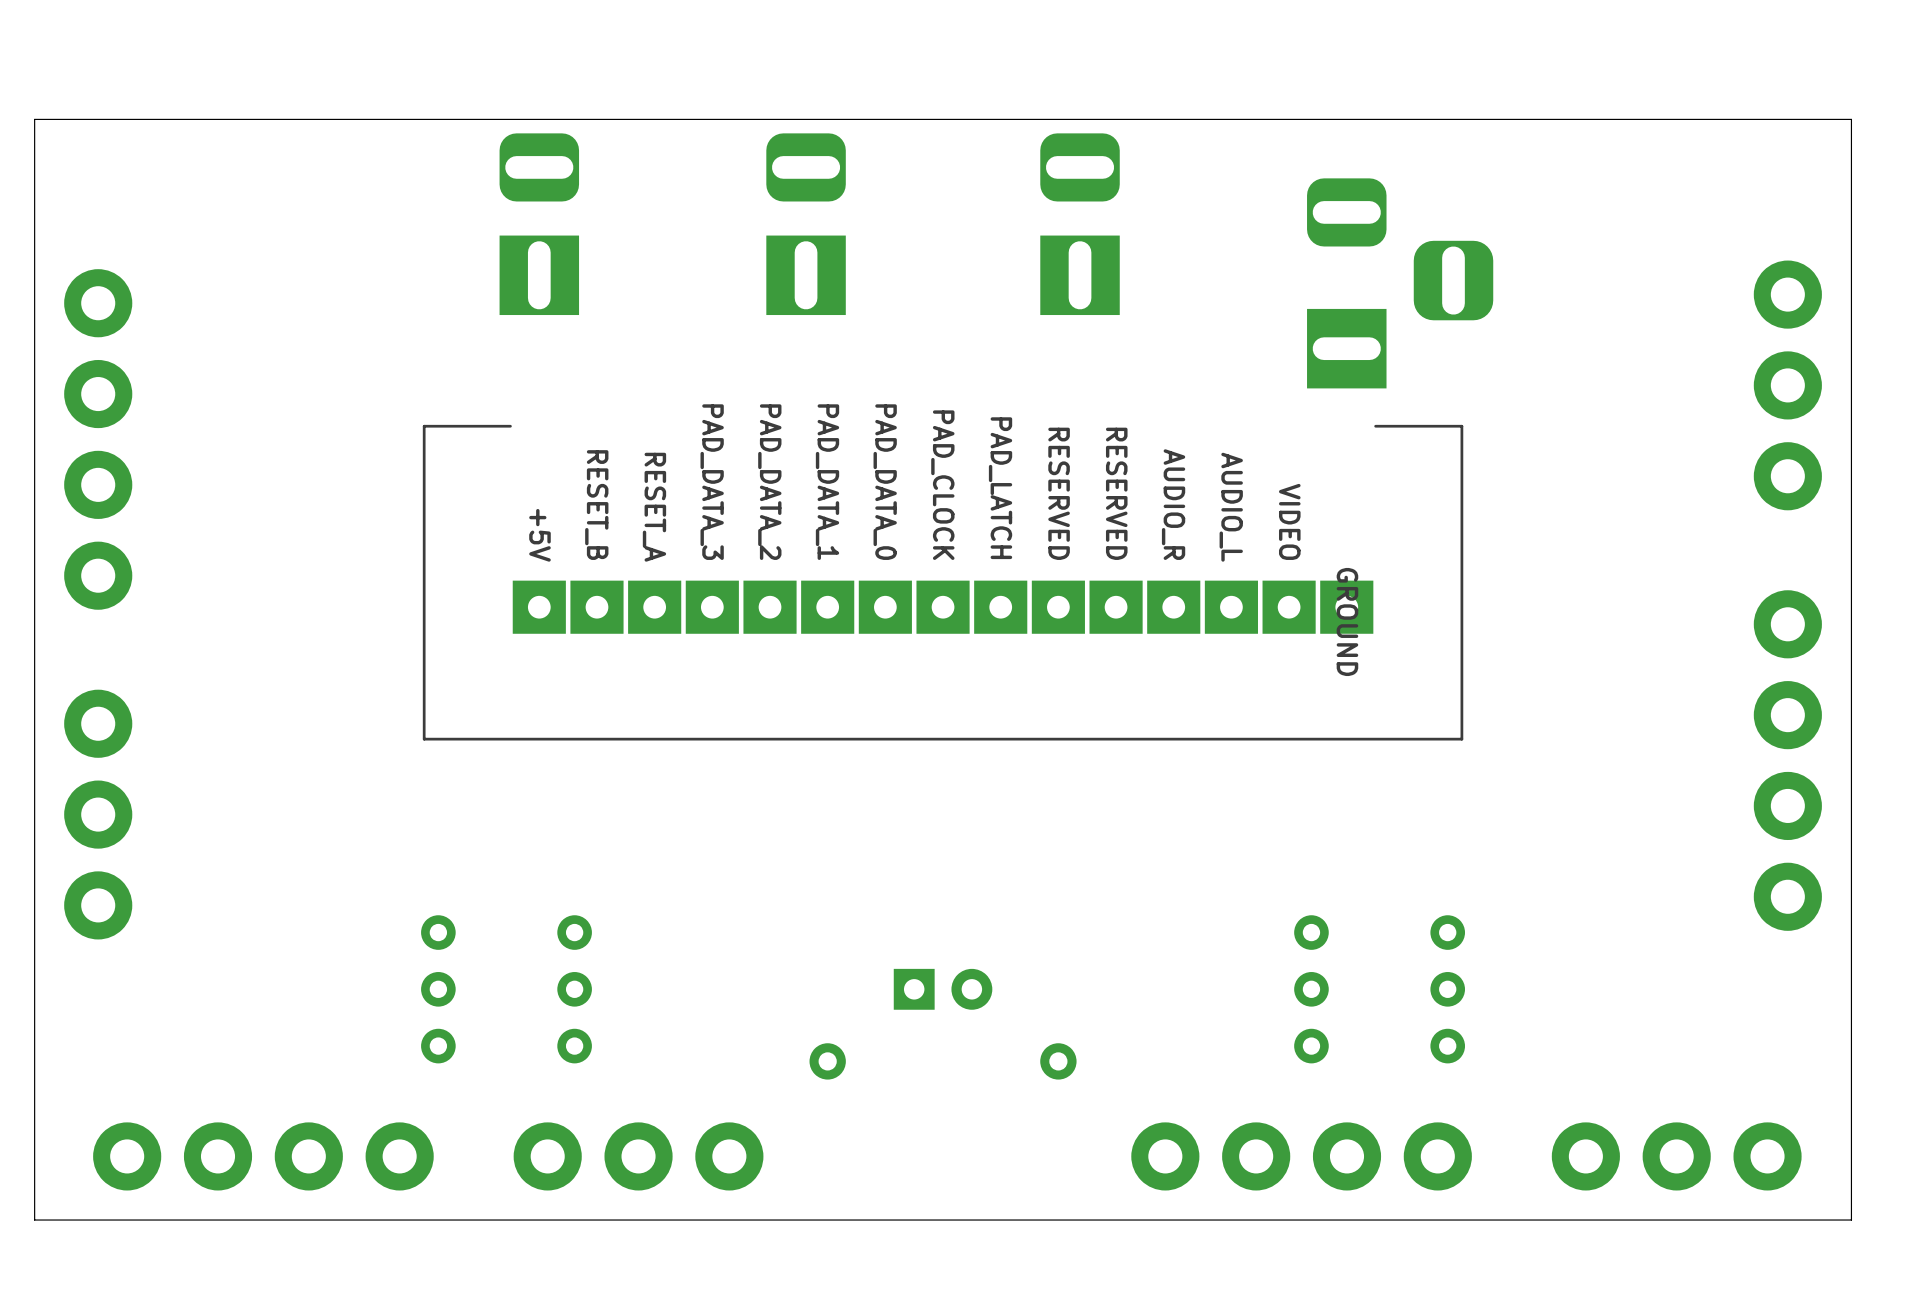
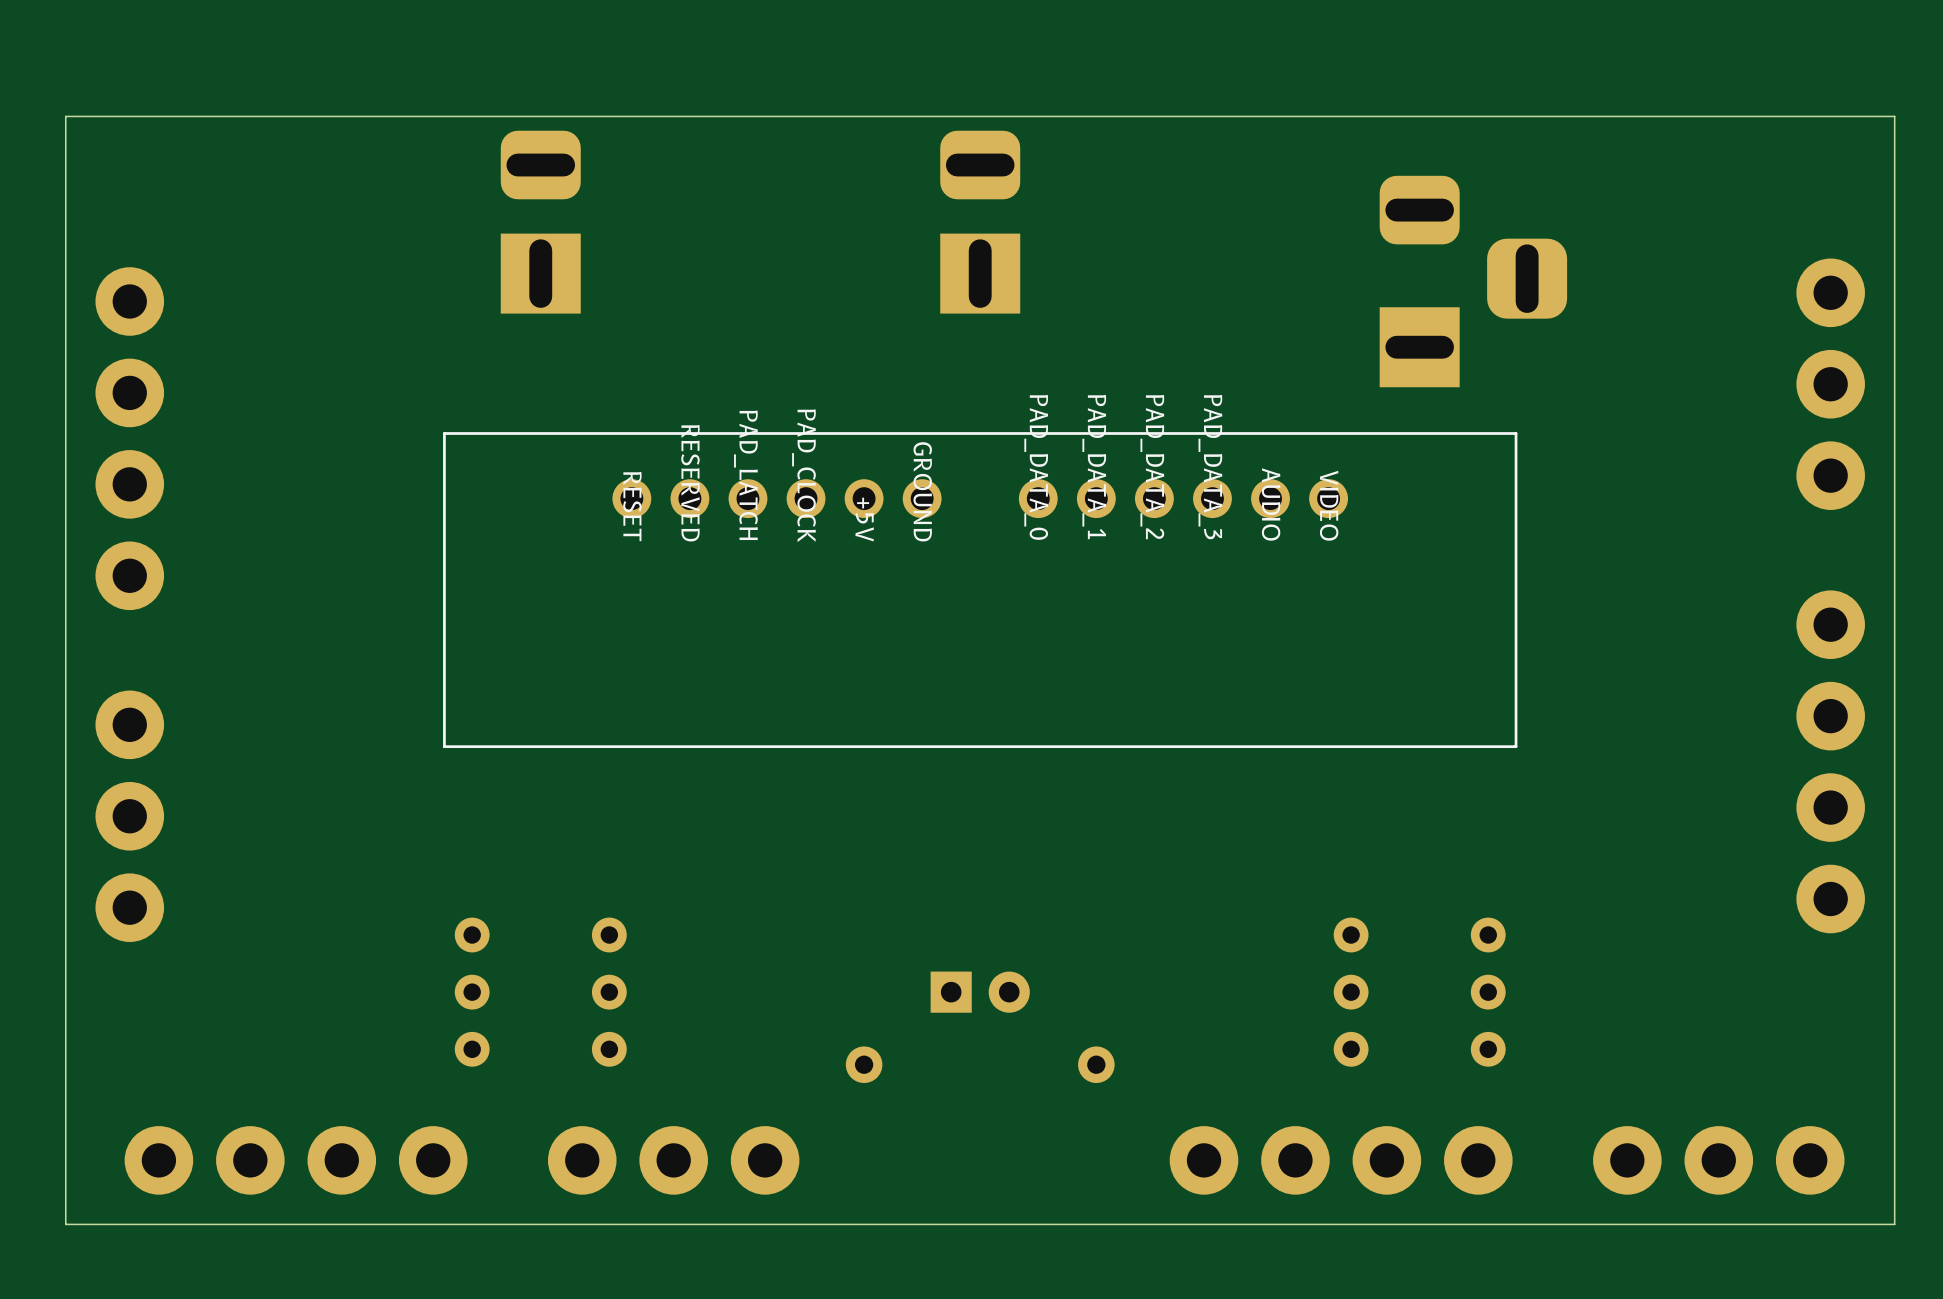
part position: (539, 224) -> (540, 222)
part: (806, 224) -> none
part: none -> (980, 222)
part: (1080, 224) -> none
part position: (1400, 283) -> (1473, 281)
part footprint: [422, 424, 1464, 741] -> [443, 432, 1518, 749]

